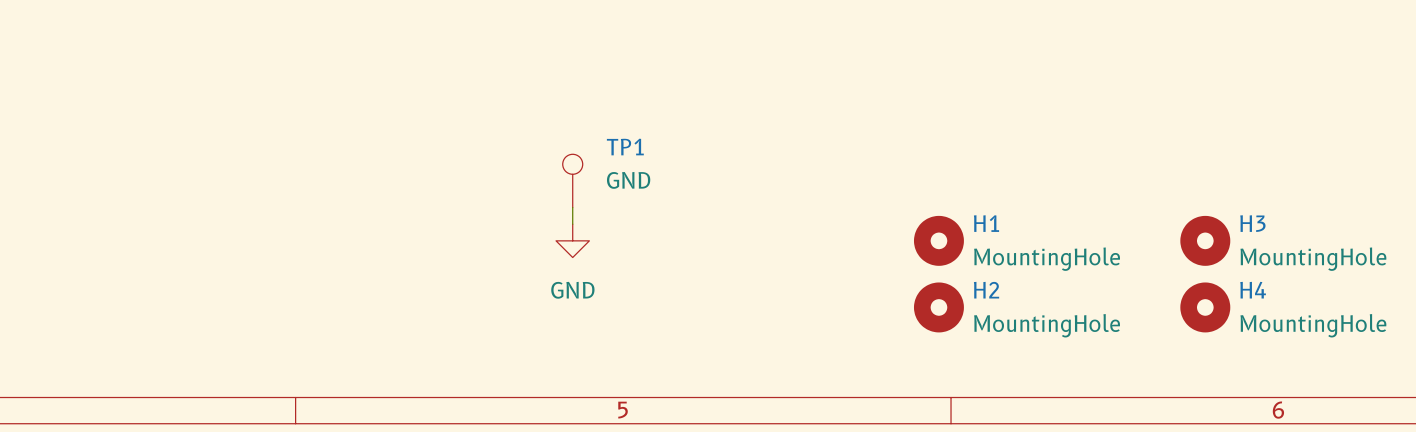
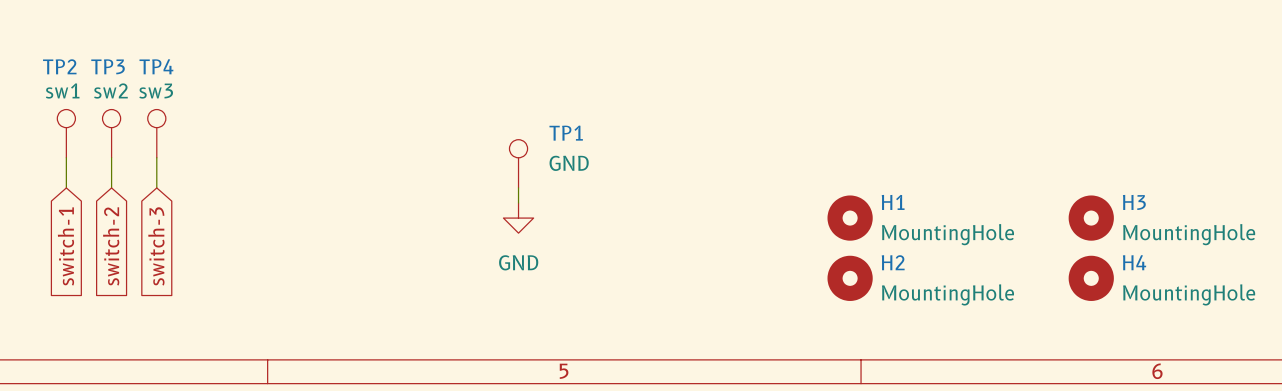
TP2: none -> sw1 (66, 133)
TP3: none -> sw2 (111, 133)
TP4: none -> sw3 (156, 133)
wire: none -> (66, 157) (66, 187)
wire: none -> (111, 157) (111, 187)
wire: none -> (156, 157) (156, 187)
global label: none -> switch-1 (65, 246)
global label: none -> switch-2 (111, 246)
global label: none -> switch-3 (156, 246)

